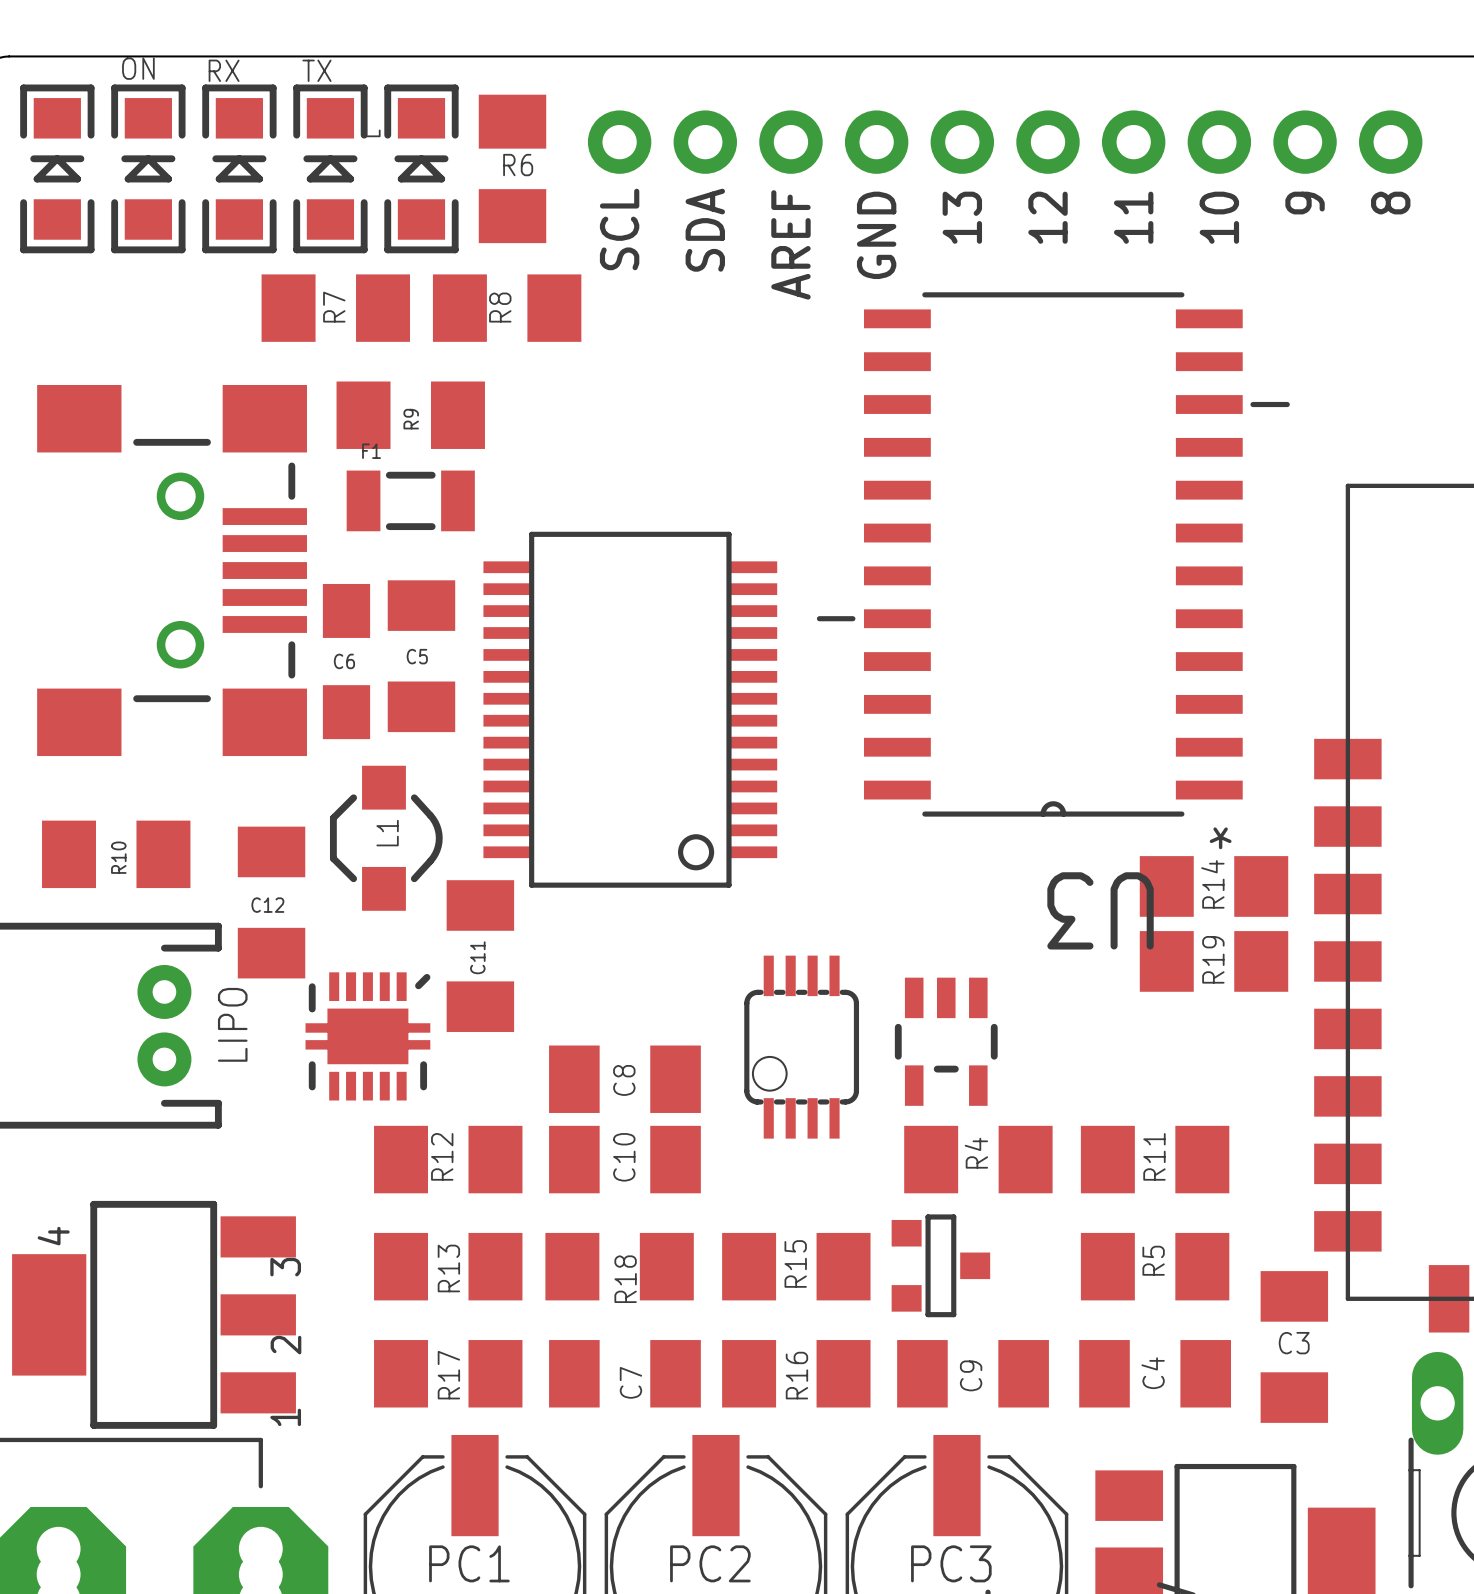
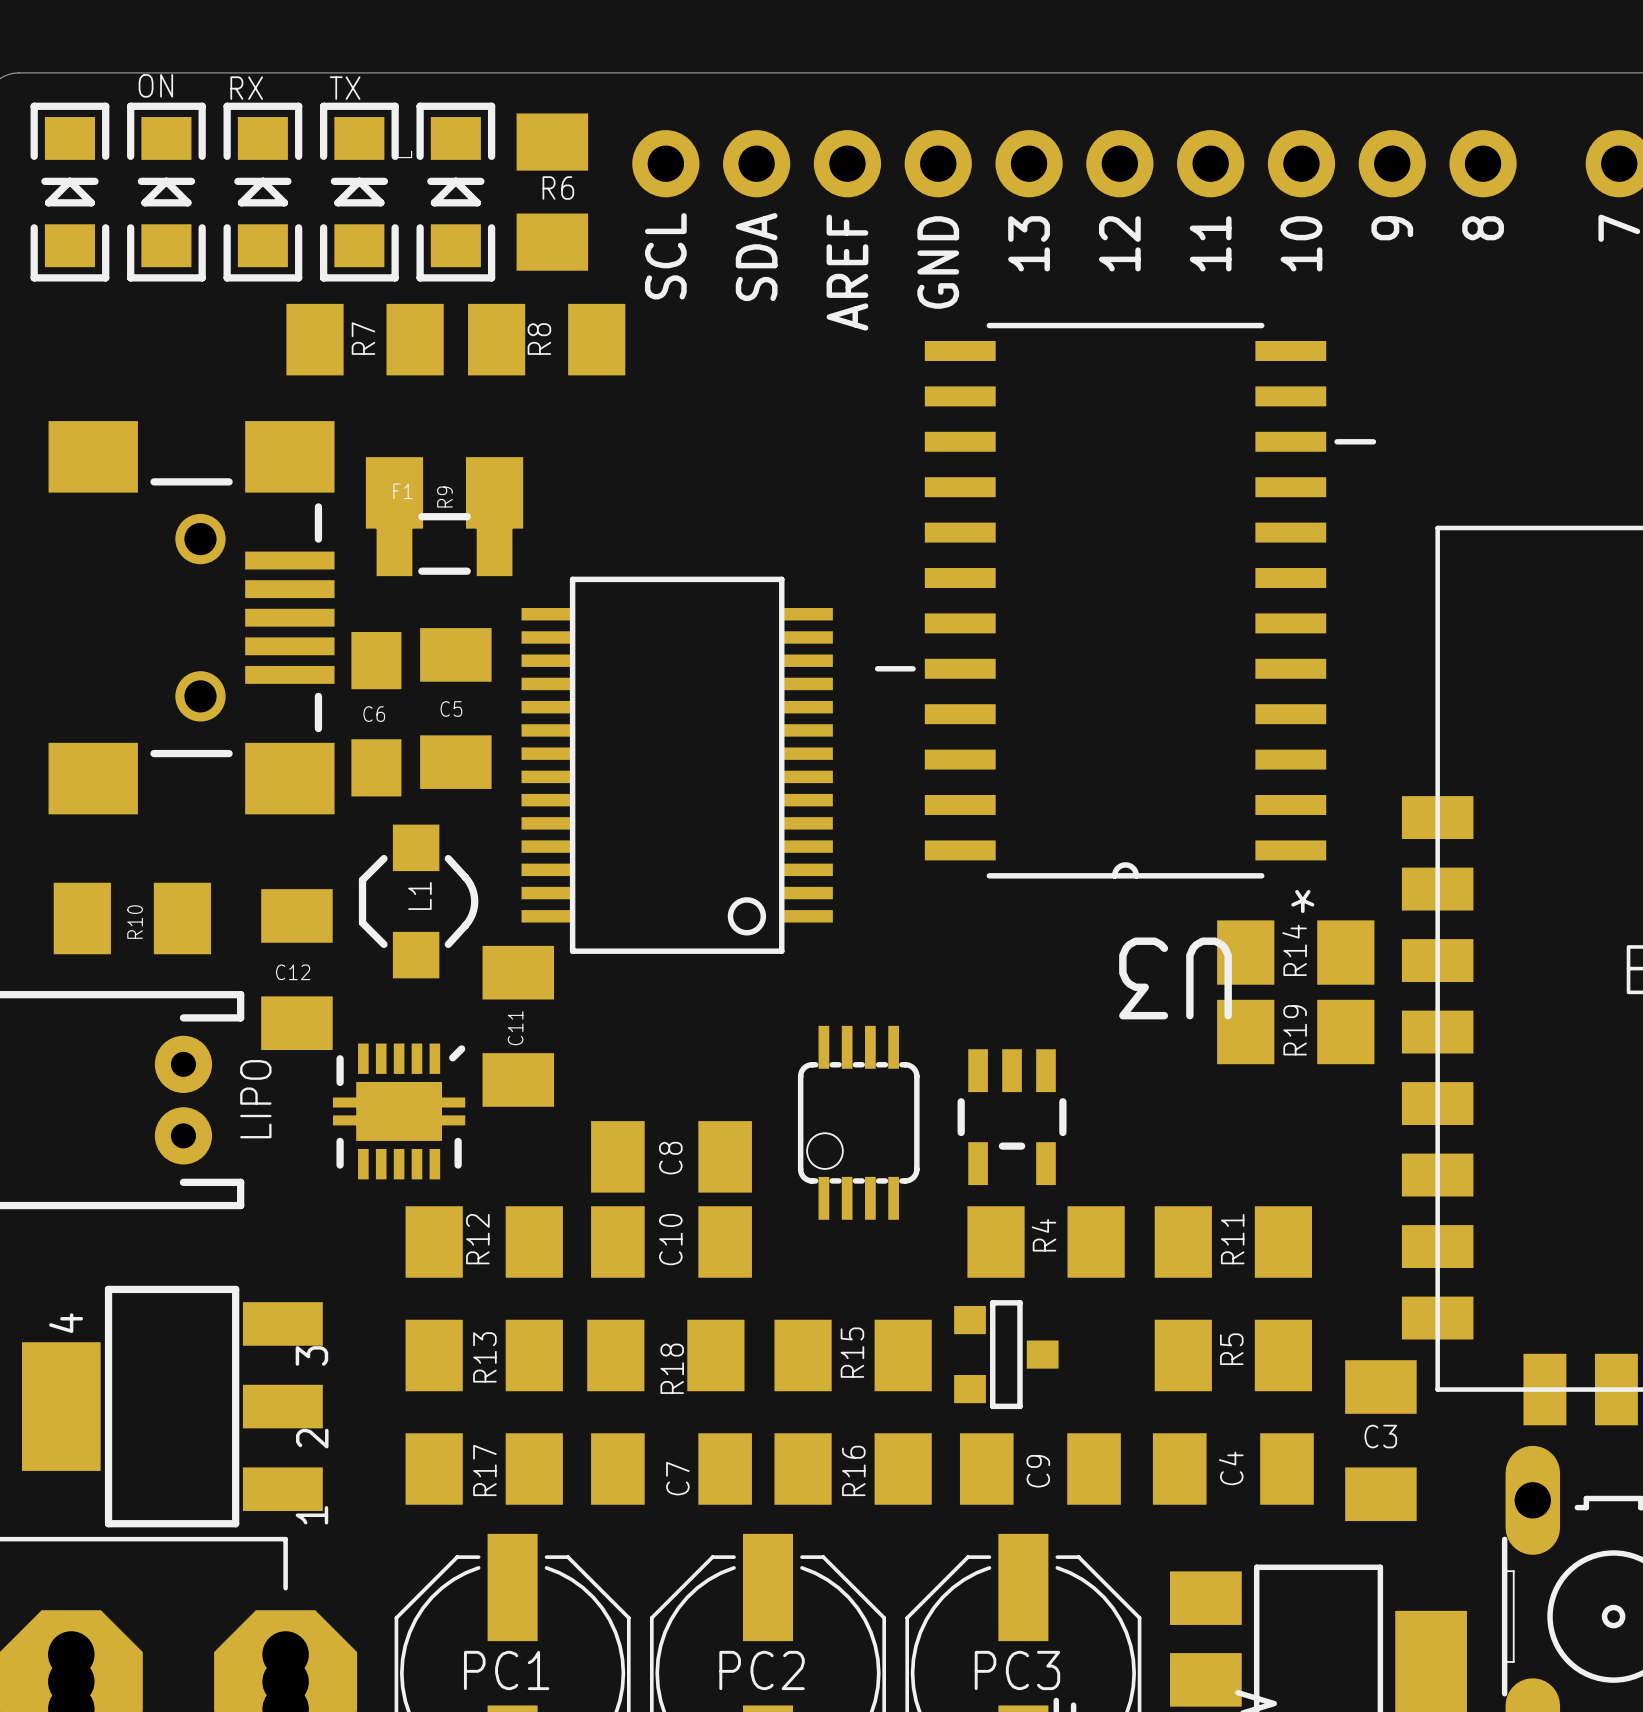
R9 position: (410, 415) -> (444, 492)

